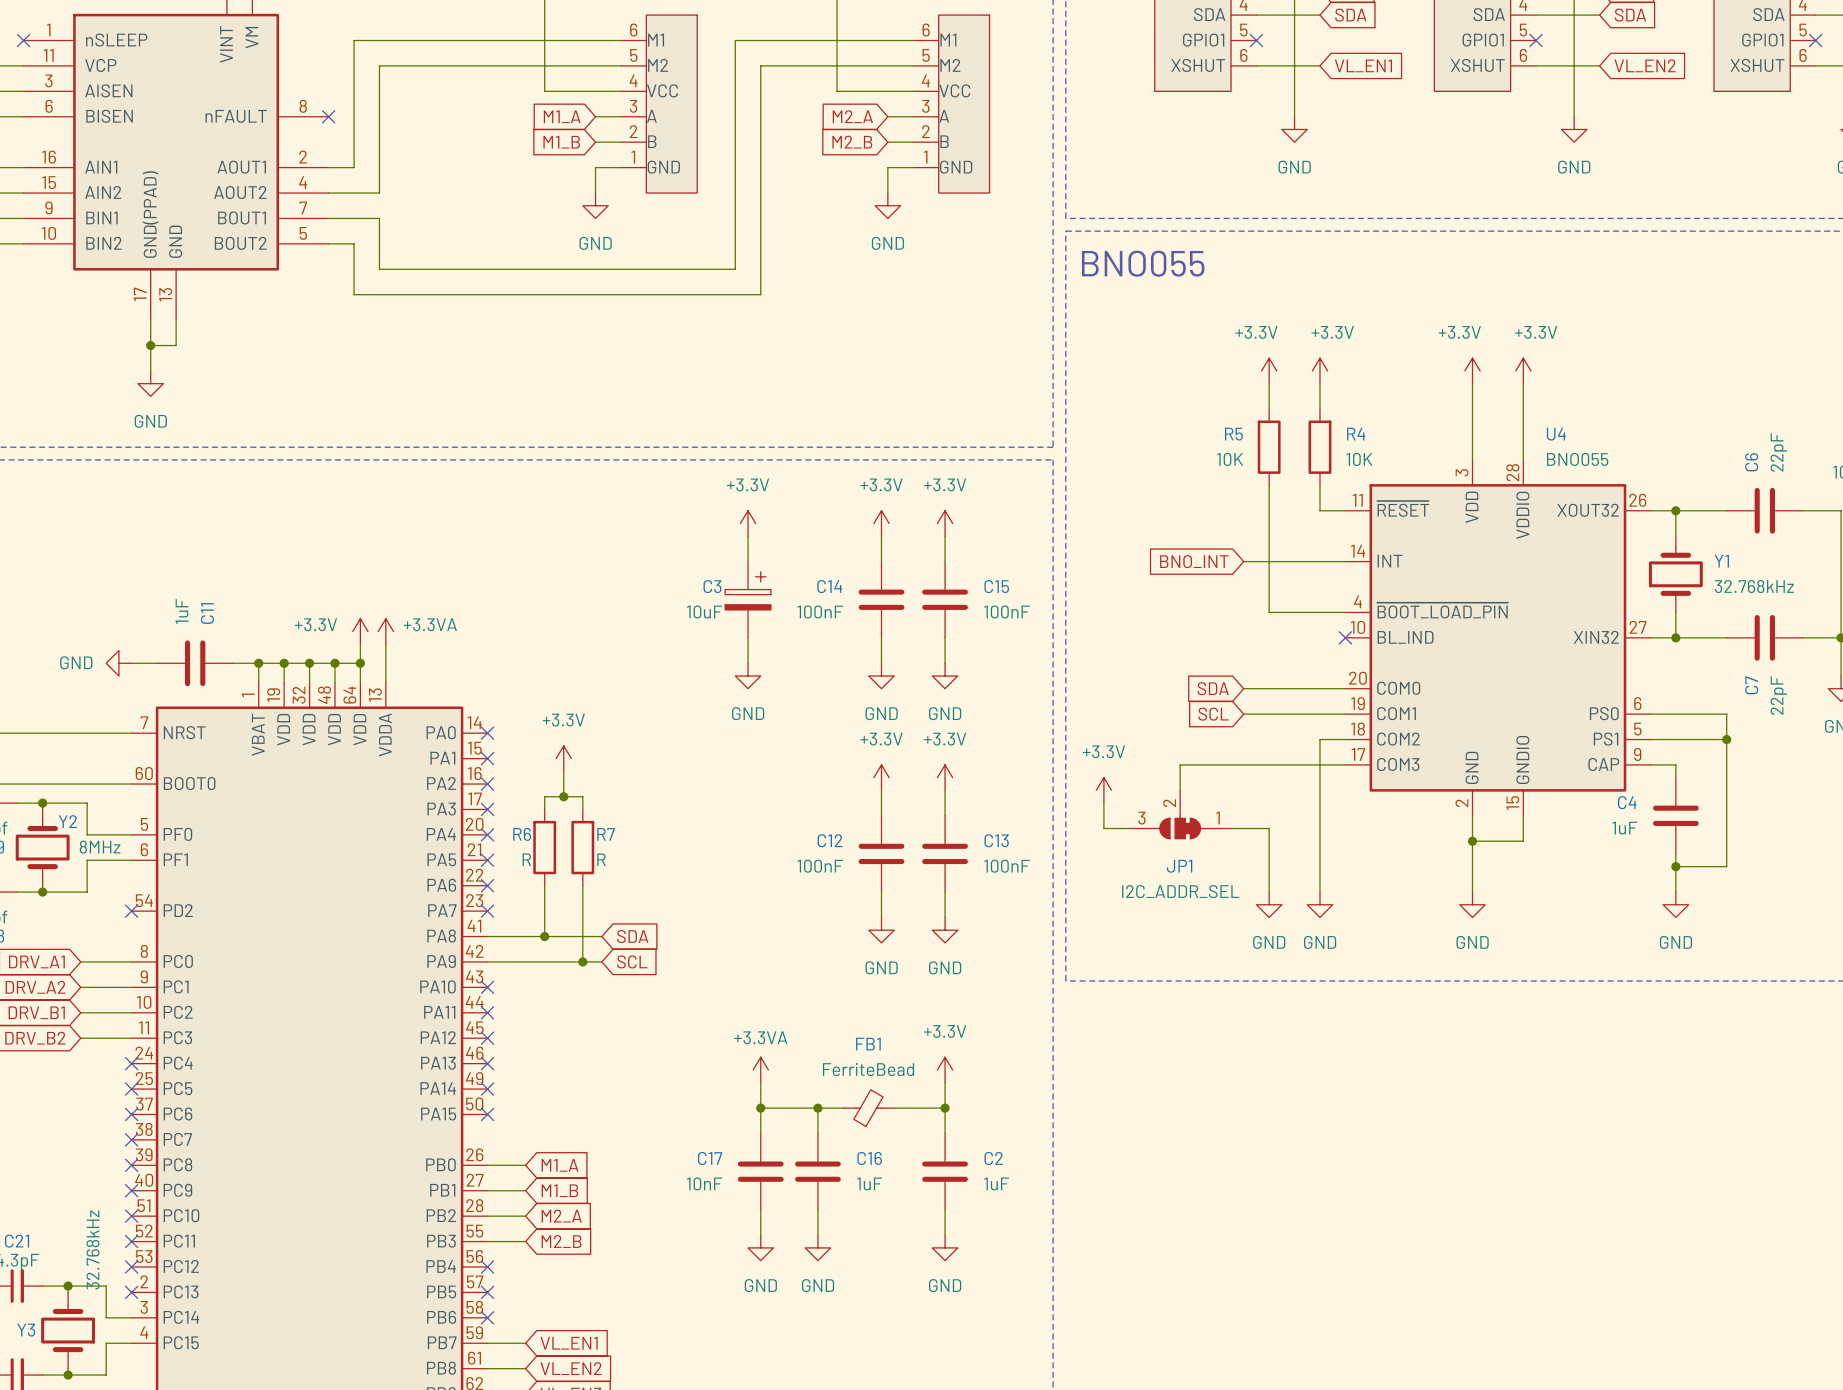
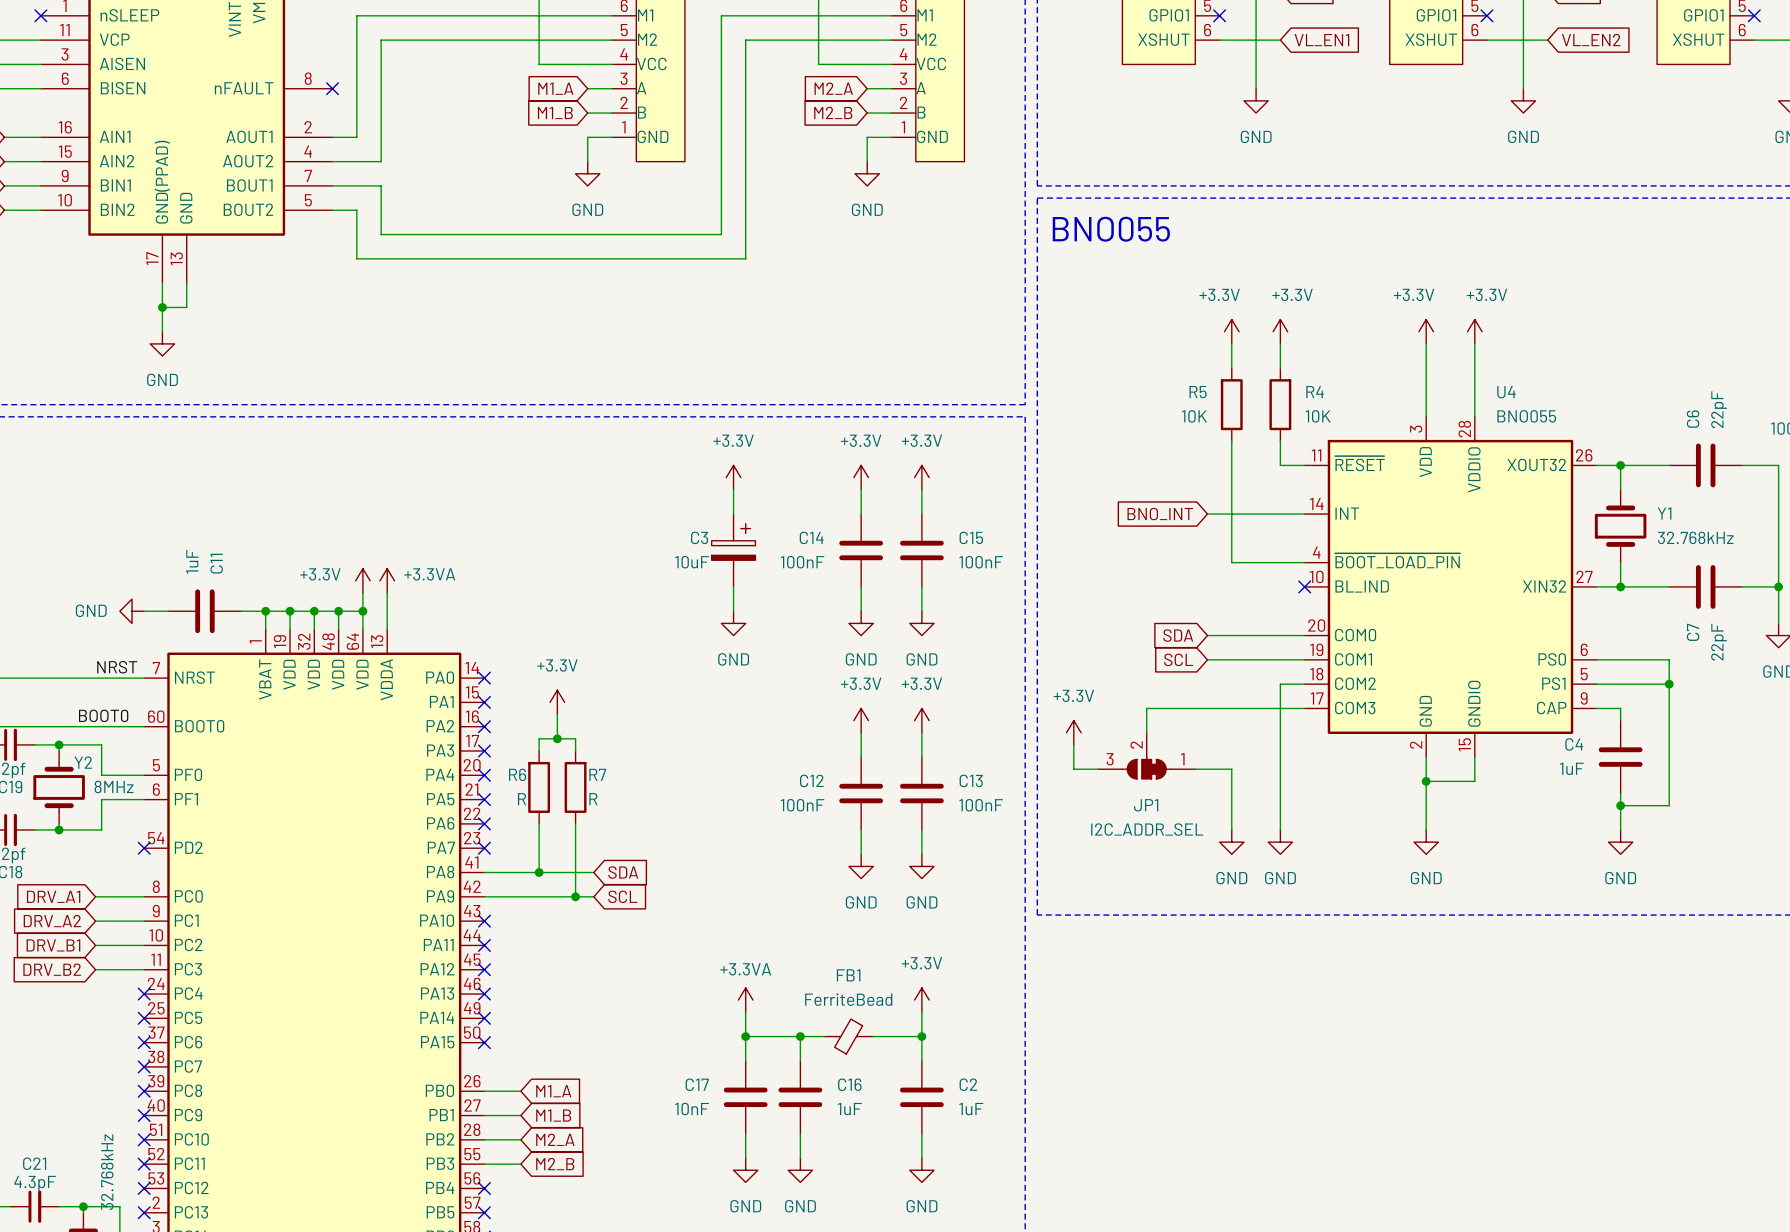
label: none -> NRST (117, 667)
label: none -> BOOT0 (103, 715)

